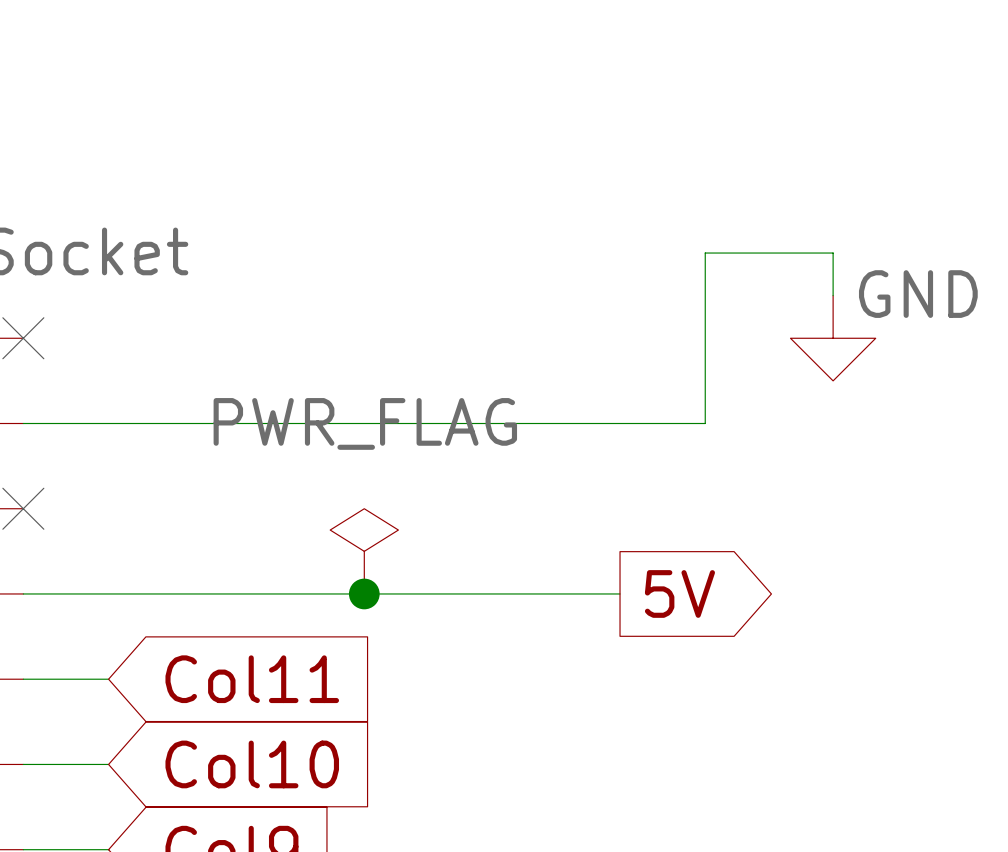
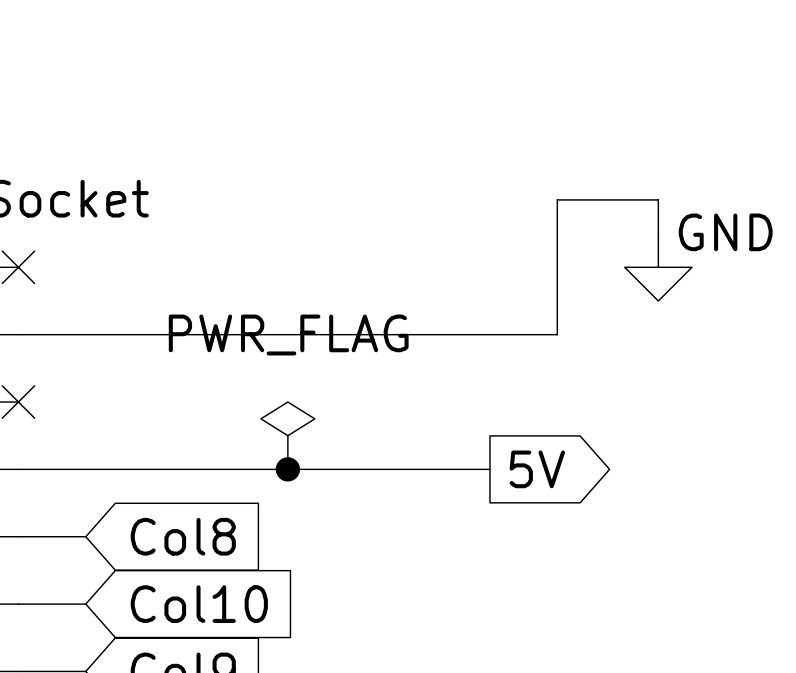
global label: Col11 (252, 679) -> Col8 (183, 536)

